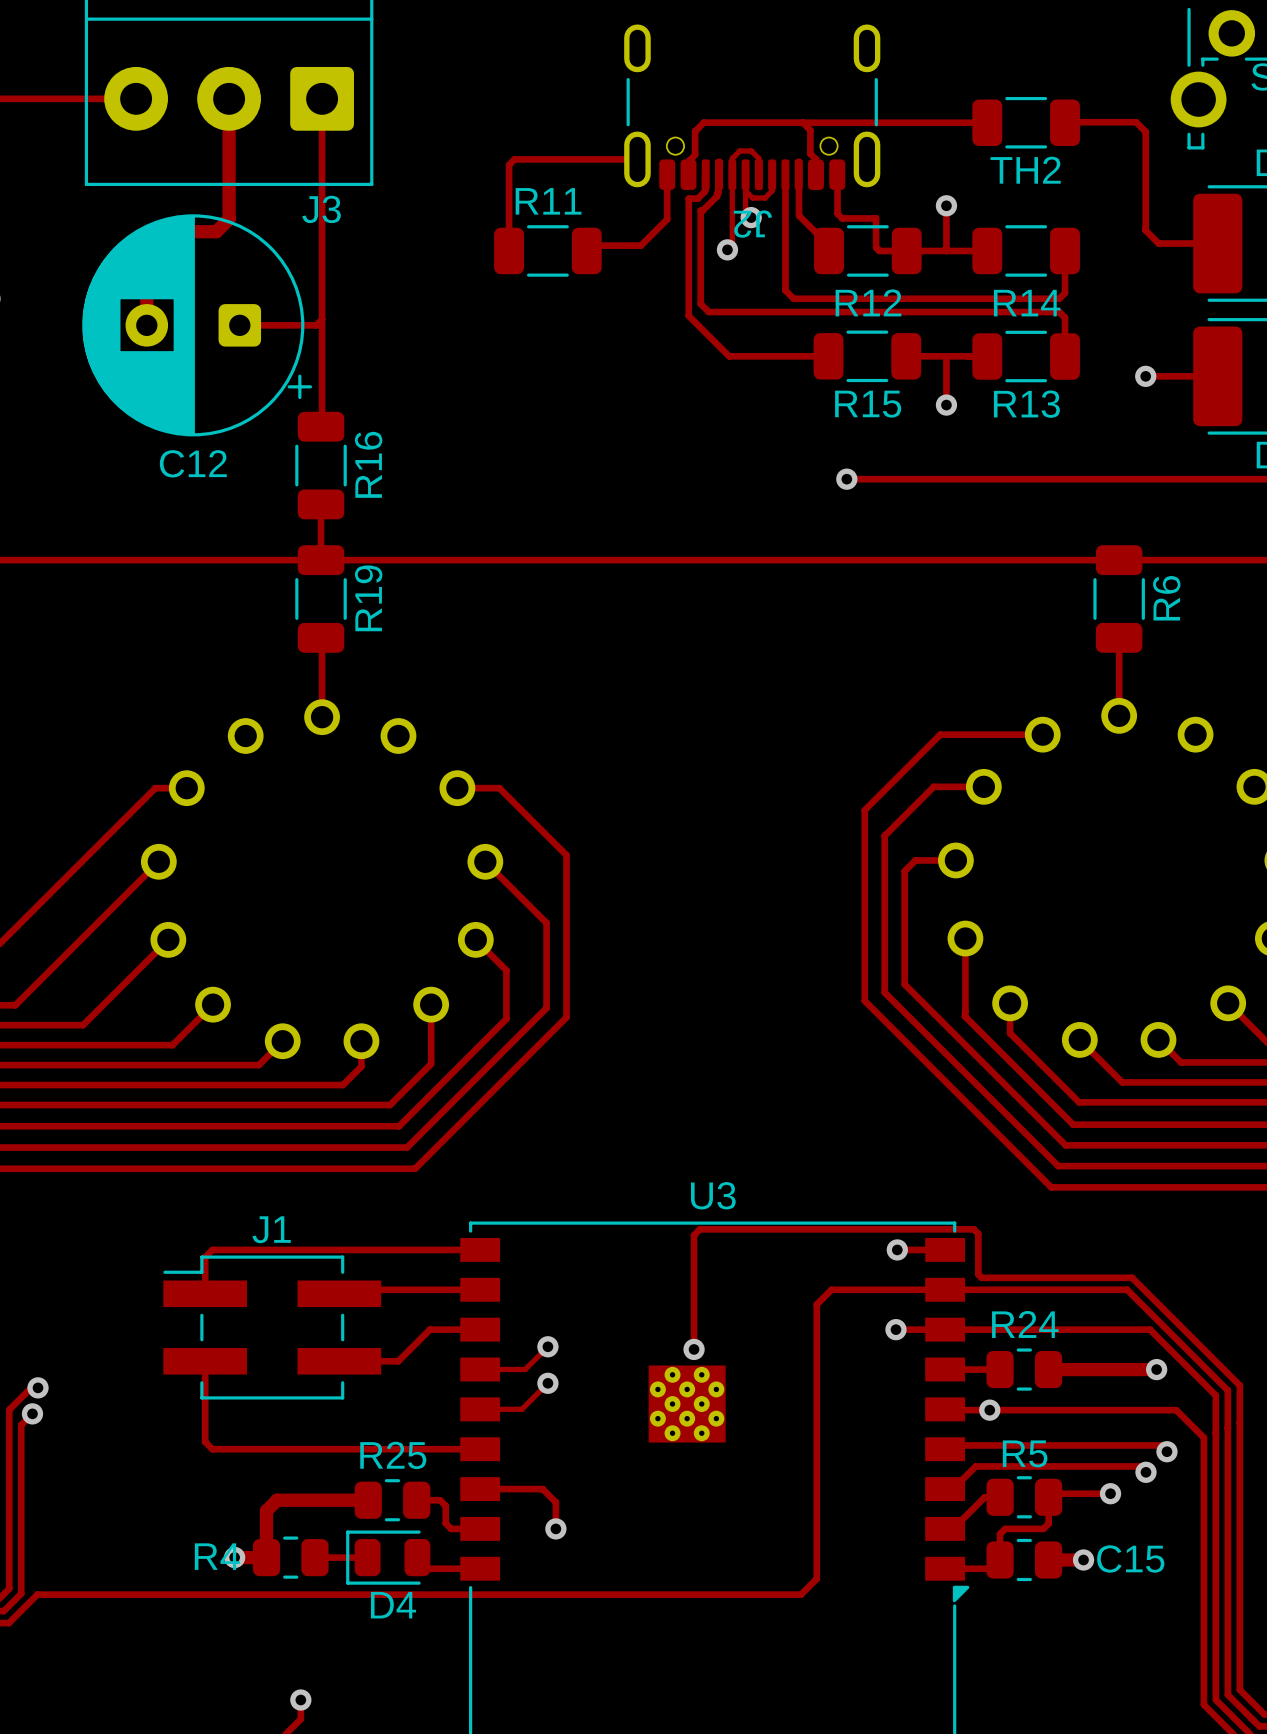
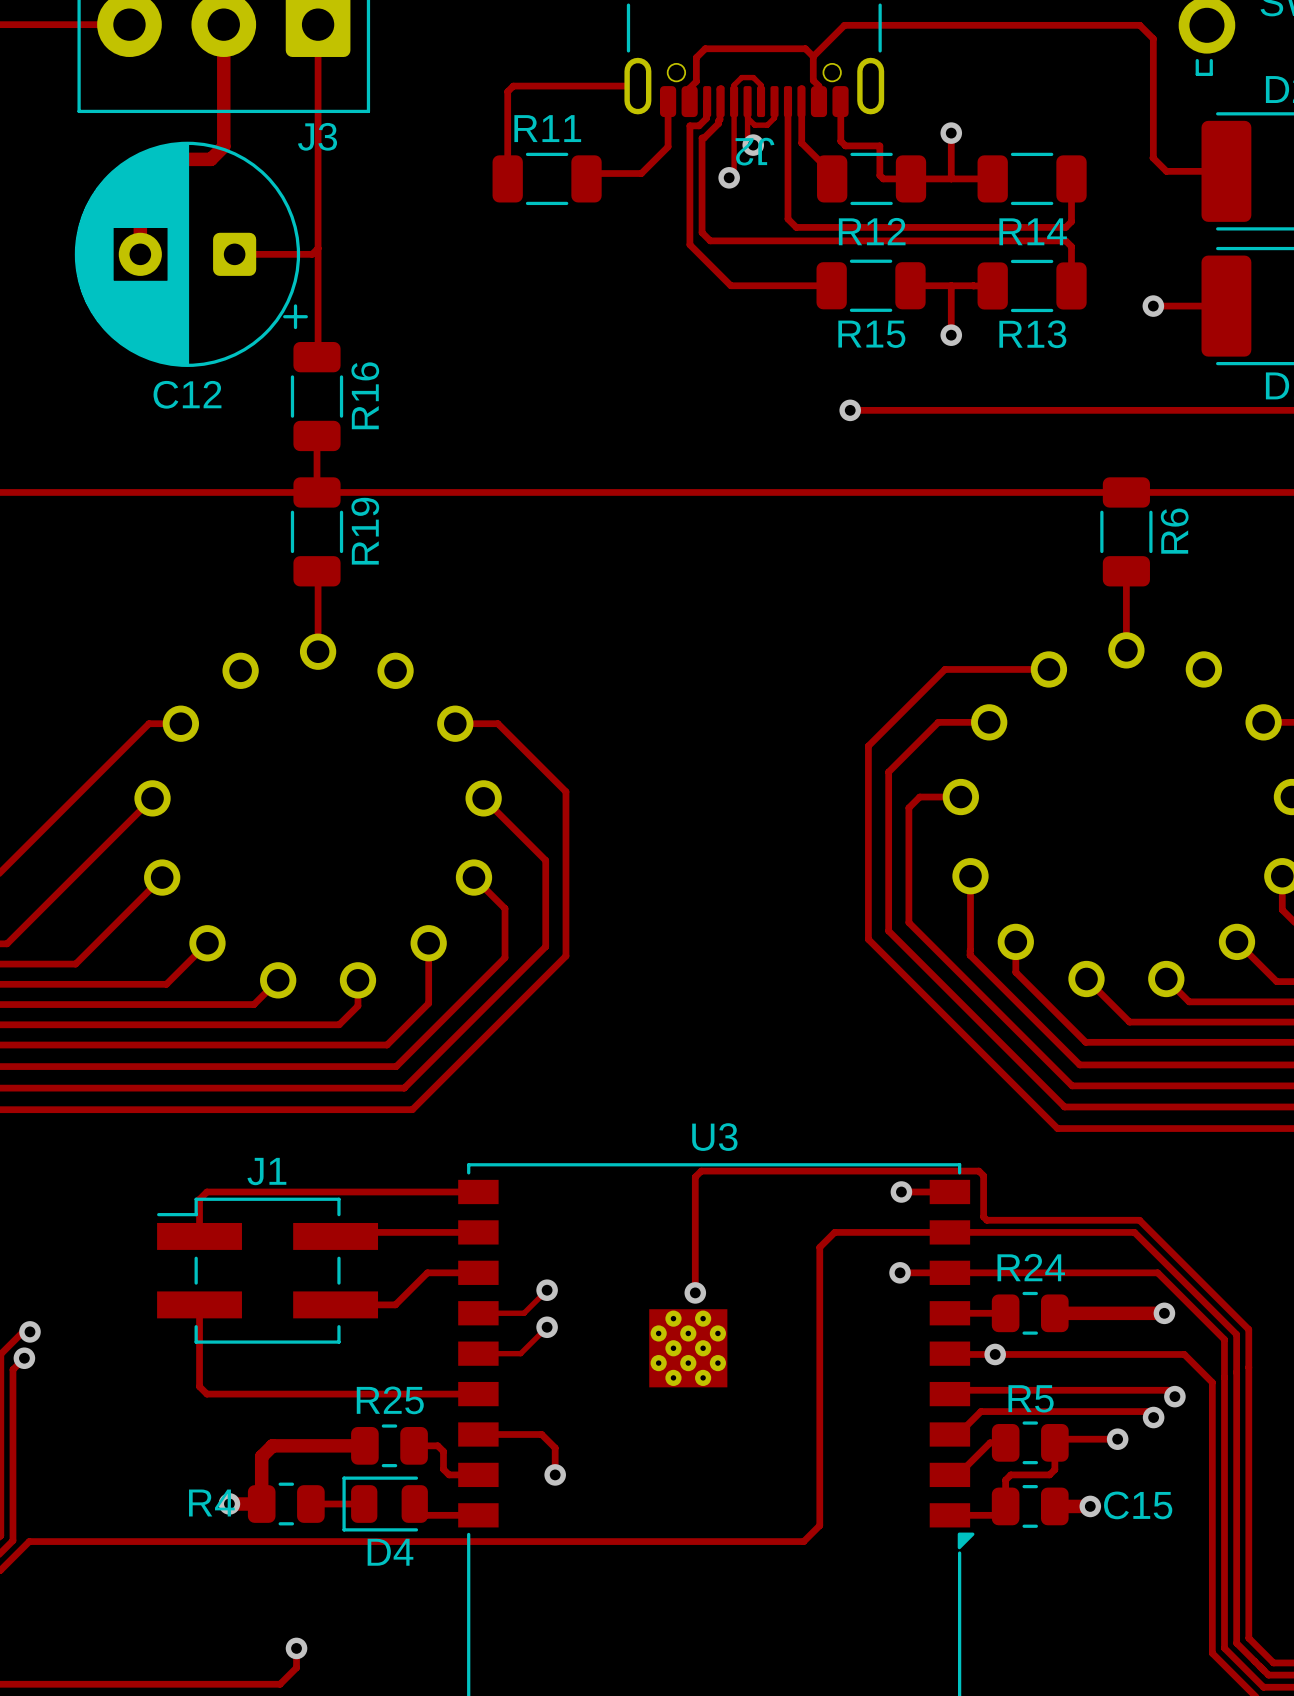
track: (802, 122) (987, 122) -> none
TH2: (1026, 122) -> none
track: (1064, 122) (1136, 122) (1145, 131) -> (813, 56) (844, 25) (1139, 25) (1153, 38) (1153, 58)

